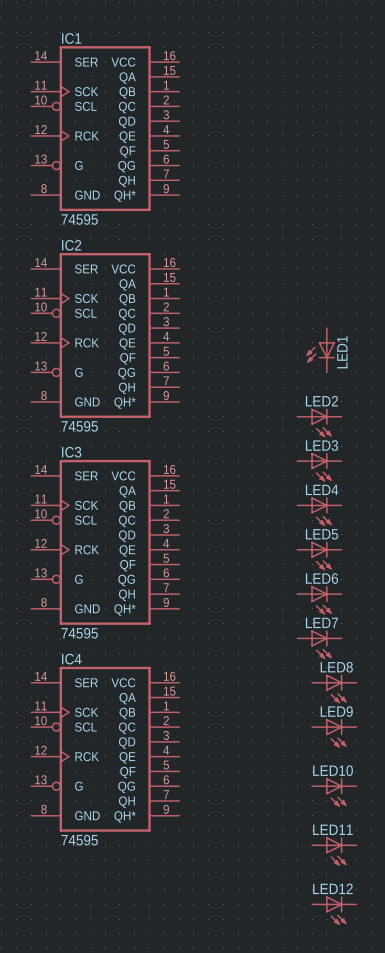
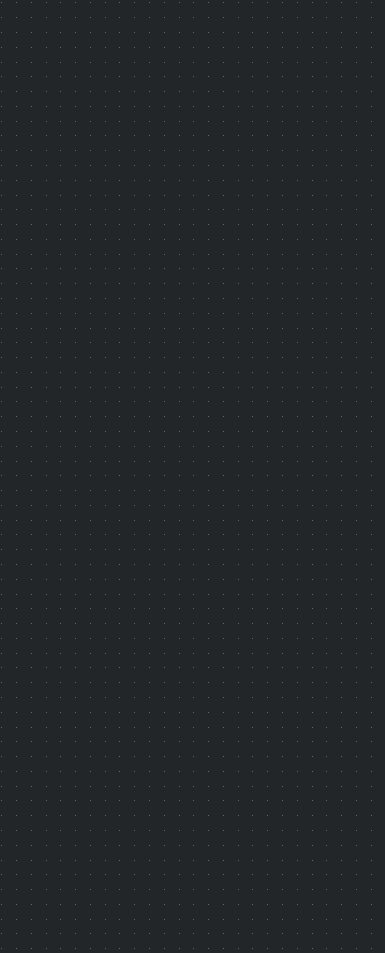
IC1: 74595 (105, 128) -> none
IC2: 74595 (105, 335) -> none
LED1: (320, 350) -> none
LED2: (319, 422) -> none
LED3: (319, 467) -> none
LED4: (319, 511) -> none
IC3: 74595 (105, 542) -> none
LED5: (319, 555) -> none
LED6: (319, 600) -> none
LED7: (319, 644) -> none
LED8: (334, 688) -> none
LED9: (334, 733) -> none
IC4: 74595 (105, 749) -> none
LED10: (334, 792) -> none
LED11: (334, 851) -> none
LED12: (334, 910) -> none

